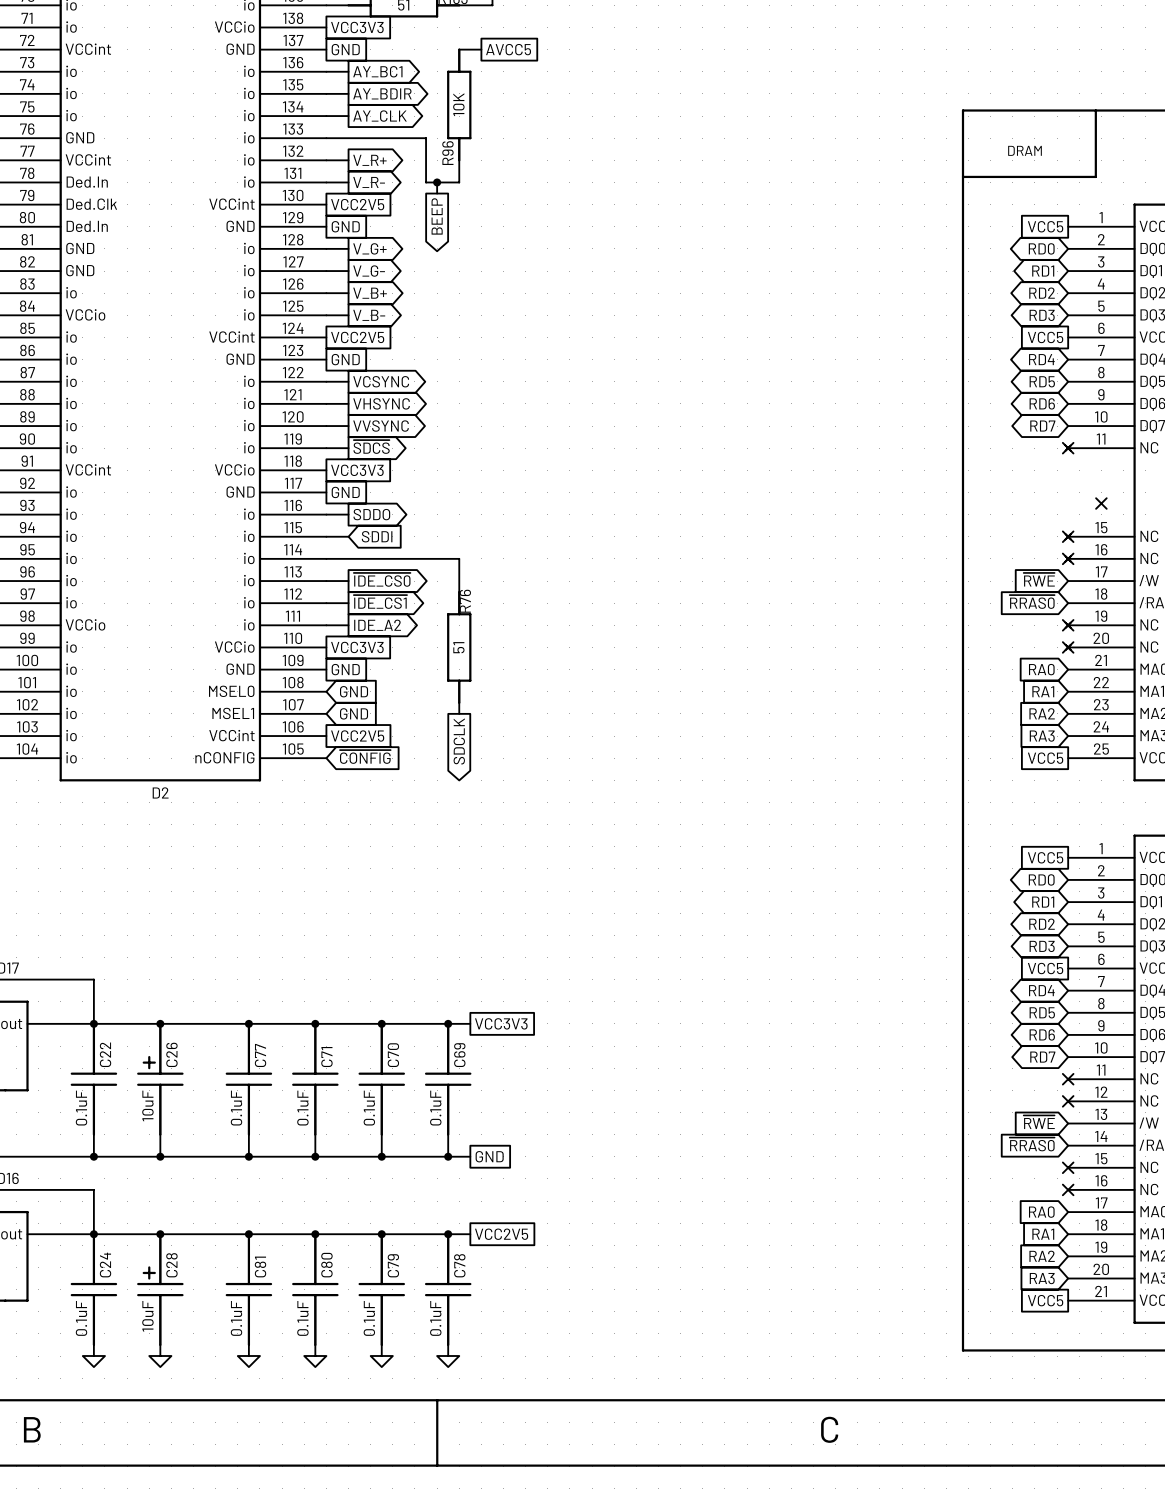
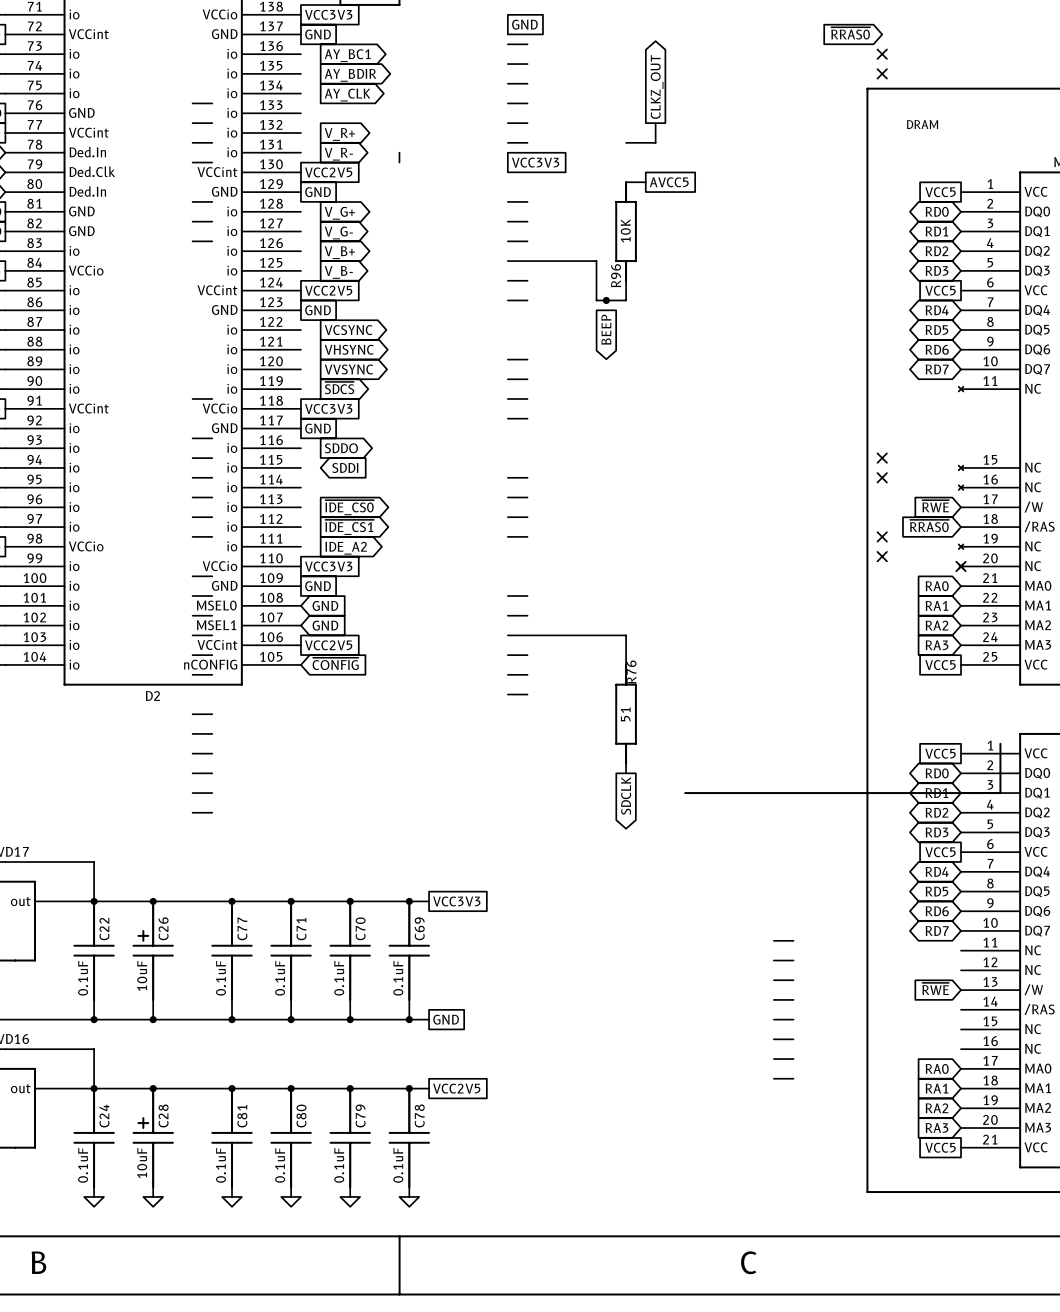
global label: none -> GND (524, 24)
global label: none -> ~{RRAS0} (850, 33)
wire: (459, 49) (481, 49) -> (507, 44) (527, 44)
global label: AVCC5 (508, 49) -> none
wire: (326, 71) (348, 71) -> (192, 123) (212, 123)
no-connect mark: none -> (882, 54)
wire: none -> (507, 64) (527, 64)
wire: (326, 93) (348, 93) -> (192, 142) (212, 142)
no-connect mark: none -> (882, 73)
R96 position: (459, 104) -> (626, 231)
wire: none -> (507, 83) (527, 83)
global label: none -> CLKZ_OUT (657, 87)
line: (1095, 110) (1095, 176) (962, 176) -> none
wire: (326, 116) (348, 116) -> (192, 162) (212, 162)
wire: none -> (507, 103) (527, 103)
wire: (326, 138) (426, 138) (426, 182) (459, 182) (459, 160) -> none
wire: none -> (507, 123) (527, 123)
wire: none -> (655, 123) (655, 142) (626, 142)
wire: (326, 160) (348, 160) -> (192, 201) (212, 201)
wire: none -> (507, 142) (527, 142)
wire: (326, 182) (348, 182) -> (192, 221) (212, 221)
junction: (437, 182) -> none
global label: none -> VCC3V3 (535, 162)
wire: none -> (626, 182) (645, 182)
global label: none -> AVCC5 (669, 182)
global label: BEEP (437, 216) -> none
wire: none -> (507, 201) (527, 201)
wire: (326, 248) (348, 248) -> (192, 241) (212, 241)
wire: none -> (507, 221) (527, 221)
wire: (326, 271) (348, 271) -> none
wire: none -> (507, 241) (527, 241)
wire: (326, 293) (348, 293) -> (192, 103) (212, 103)
wire: none -> (507, 261) (596, 261) (596, 300) (626, 300) (626, 280)
wire: (326, 315) (348, 315) -> none
wire: none -> (507, 280) (527, 280)
wire: none -> (507, 300) (527, 300)
junction: none -> (606, 300)
wire: (326, 381) (348, 381) -> (192, 398) (212, 398)
global label: none -> BEEP (606, 329)
wire: (326, 403) (348, 403) -> (192, 477) (212, 477)
wire: none -> (507, 359) (527, 359)
wire: (326, 426) (348, 426) -> (192, 438) (212, 438)
wire: none -> (507, 379) (527, 379)
wire: (326, 448) (348, 448) -> (192, 458) (212, 458)
no-connect mark: (1068, 448) -> none
wire: none -> (507, 398) (527, 398)
wire: none -> (507, 418) (527, 418)
no-connect mark: (1101, 503) -> none
wire: (326, 514) (348, 514) -> (192, 517) (212, 517)
no-connect mark: none -> (882, 458)
wire: (326, 536) (348, 536) -> (192, 536) (212, 536)
no-connect mark: (1068, 536) -> none
wire: none -> (507, 477) (527, 477)
no-connect mark: none -> (882, 477)
wire: (326, 558) (459, 558) (459, 592) -> none
no-connect mark: (1068, 558) -> none
wire: none -> (192, 497) (212, 497)
wire: none -> (507, 497) (527, 497)
wire: (326, 581) (348, 581) -> (192, 576) (212, 576)
wire: none -> (507, 517) (527, 517)
wire: (326, 603) (348, 603) -> (192, 596) (212, 596)
wire: none -> (507, 536) (527, 536)
no-connect mark: none -> (882, 536)
wire: (326, 625) (348, 625) -> (192, 615) (212, 615)
no-connect mark: (1068, 625) -> none
no-connect mark: none -> (882, 556)
R76 position: (459, 647) -> (626, 714)
wire: none -> (507, 596) (527, 596)
wire: (459, 702) (459, 713) -> none
wire: none -> (507, 615) (527, 615)
wire: none -> (192, 635) (212, 635)
wire: none -> (507, 635) (626, 635) (626, 664)
global label: SDCLK (459, 741) -> none
wire: none -> (192, 655) (212, 655)
wire: none -> (507, 655) (527, 655)
wire: none -> (192, 674) (212, 674)
wire: none -> (507, 674) (527, 674)
wire: none -> (507, 694) (527, 694)
wire: none -> (192, 714) (212, 714)
wire: none -> (192, 733) (212, 733)
line: none -> (1000, 743) (1000, 793) (685, 793)
wire: none -> (192, 753) (212, 753)
wire: none -> (626, 763) (626, 773)
wire: none -> (192, 773) (212, 773)
wire: none -> (192, 793) (212, 793)
global label: none -> SDCLK (626, 795)
wire: none -> (192, 812) (212, 812)
wire: none -> (773, 940) (793, 940)
no-connect mark: (1068, 1079) -> none
wire: none -> (773, 960) (793, 960)
no-connect mark: (1068, 1101) -> none
wire: none -> (773, 980) (793, 980)
wire: none -> (773, 999) (793, 999)
global label: ~{RRAS0} (1032, 1144) -> none
wire: none -> (773, 1019) (793, 1019)
no-connect mark: (1068, 1167) -> none
wire: none -> (773, 1039) (793, 1039)
no-connect mark: (1068, 1189) -> none
wire: none -> (773, 1059) (793, 1059)
wire: none -> (773, 1078) (793, 1078)

